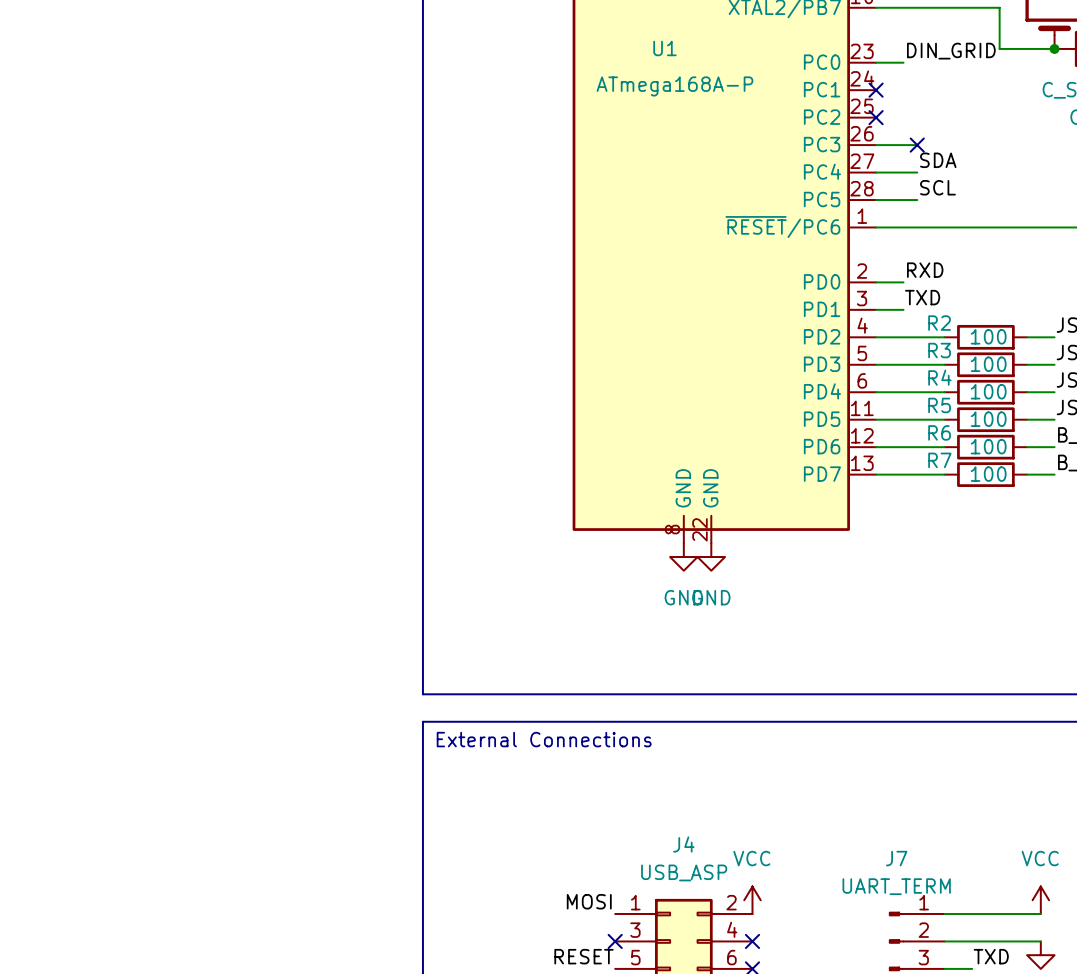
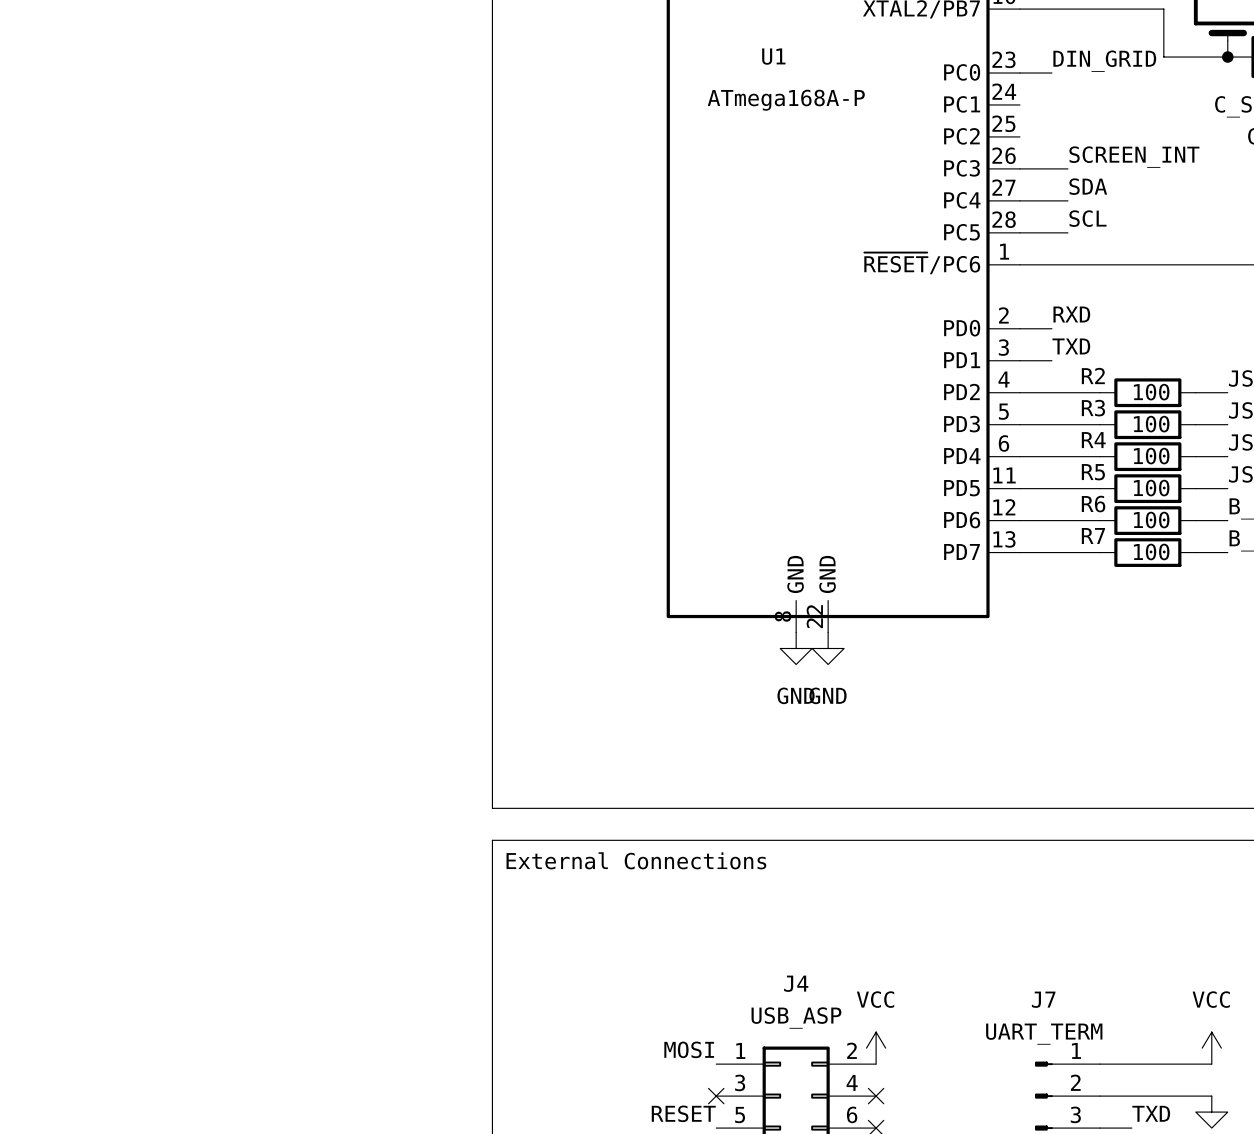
no-connect mark: (876, 90) -> none
no-connect mark: (876, 117) -> none
label: none -> SCREEN_INT (1134, 157)
no-connect mark: (917, 145) -> none

